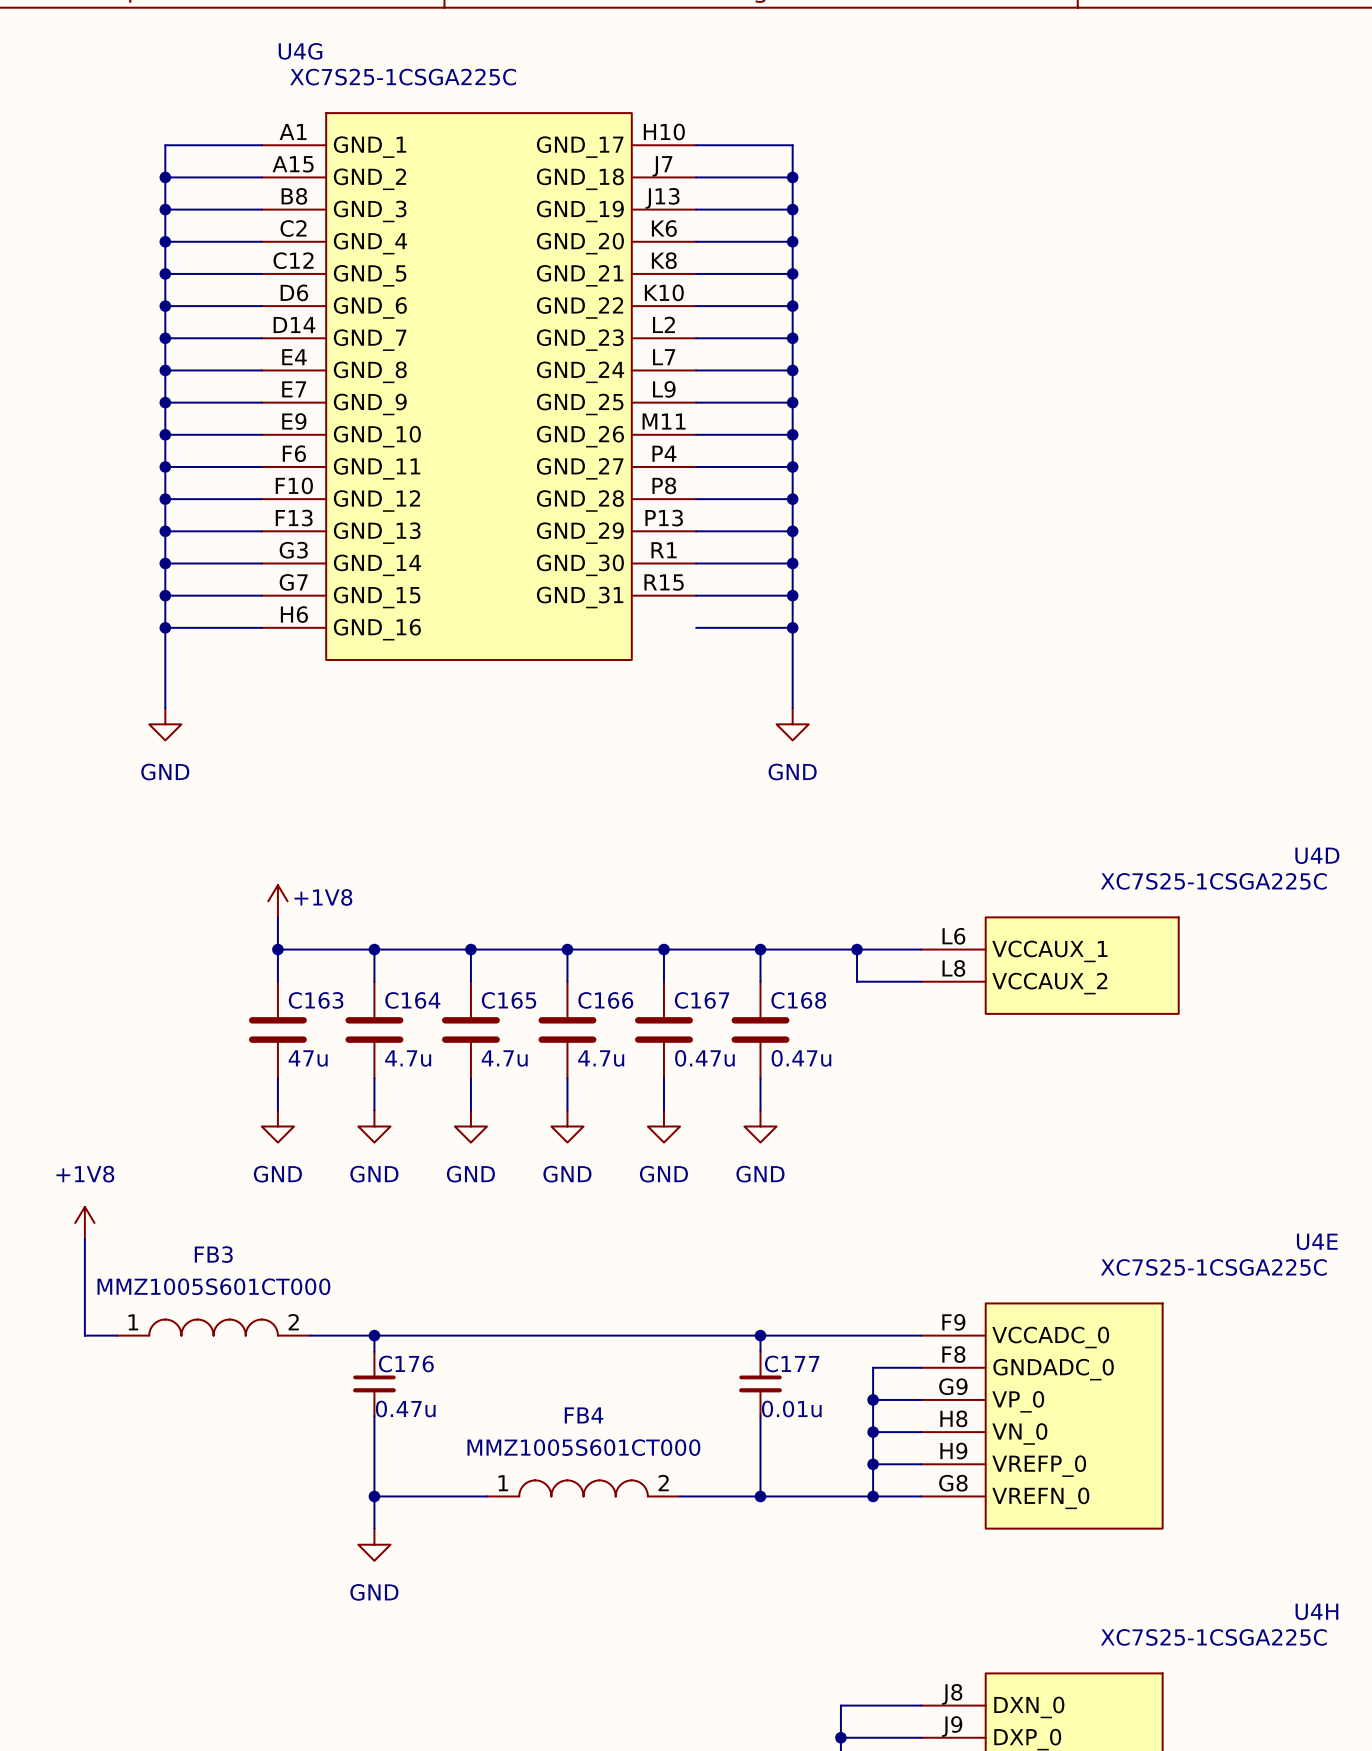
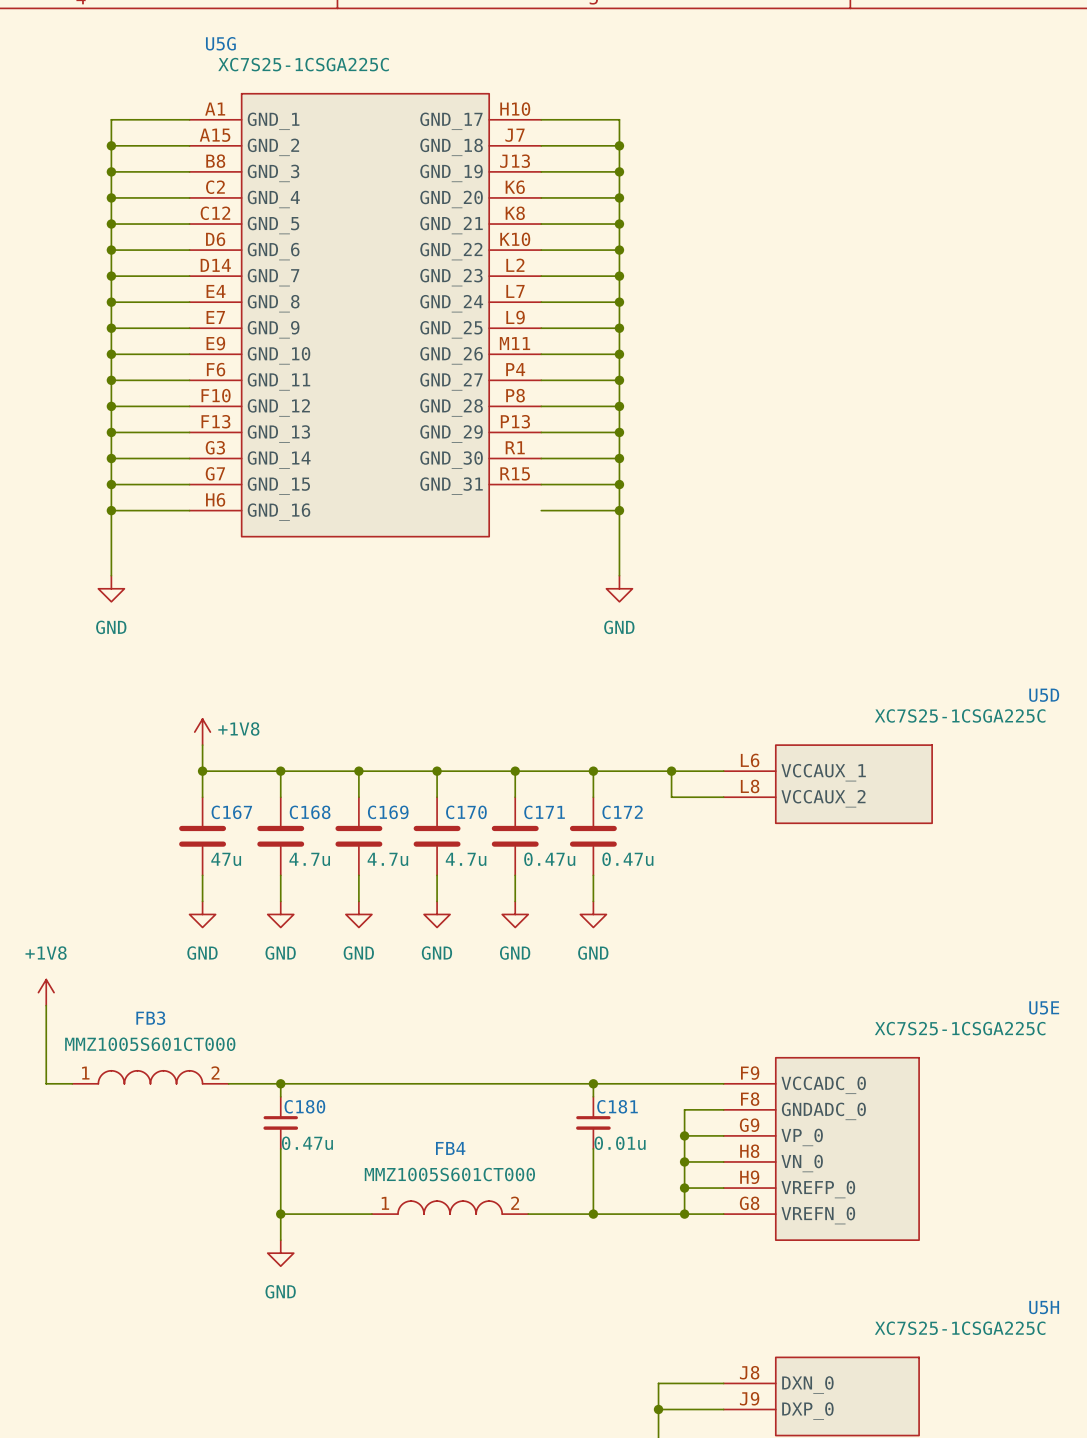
U4G name: U4G (300, 51) -> U5G (220, 43)
U4D name: U4D (1317, 855) -> U5D (1044, 695)
C163 name: C163 (316, 1000) -> C167 (231, 812)
C164 name: C164 (412, 1000) -> C168 (310, 812)
C165 name: C165 (509, 1000) -> C169 (388, 812)
C166 name: C166 (605, 1000) -> C170 (466, 812)
C167 name: C167 (702, 1000) -> C171 (544, 812)
C168 name: C168 (798, 1000) -> C172 (622, 812)
U4E name: U4E (1317, 1241) -> U5E (1044, 1007)
C176 name: C176 (406, 1363) -> C180 (304, 1106)
C177 name: C177 (792, 1363) -> C181 (617, 1106)
U4H name: U4H (1316, 1611) -> U5H (1044, 1307)

